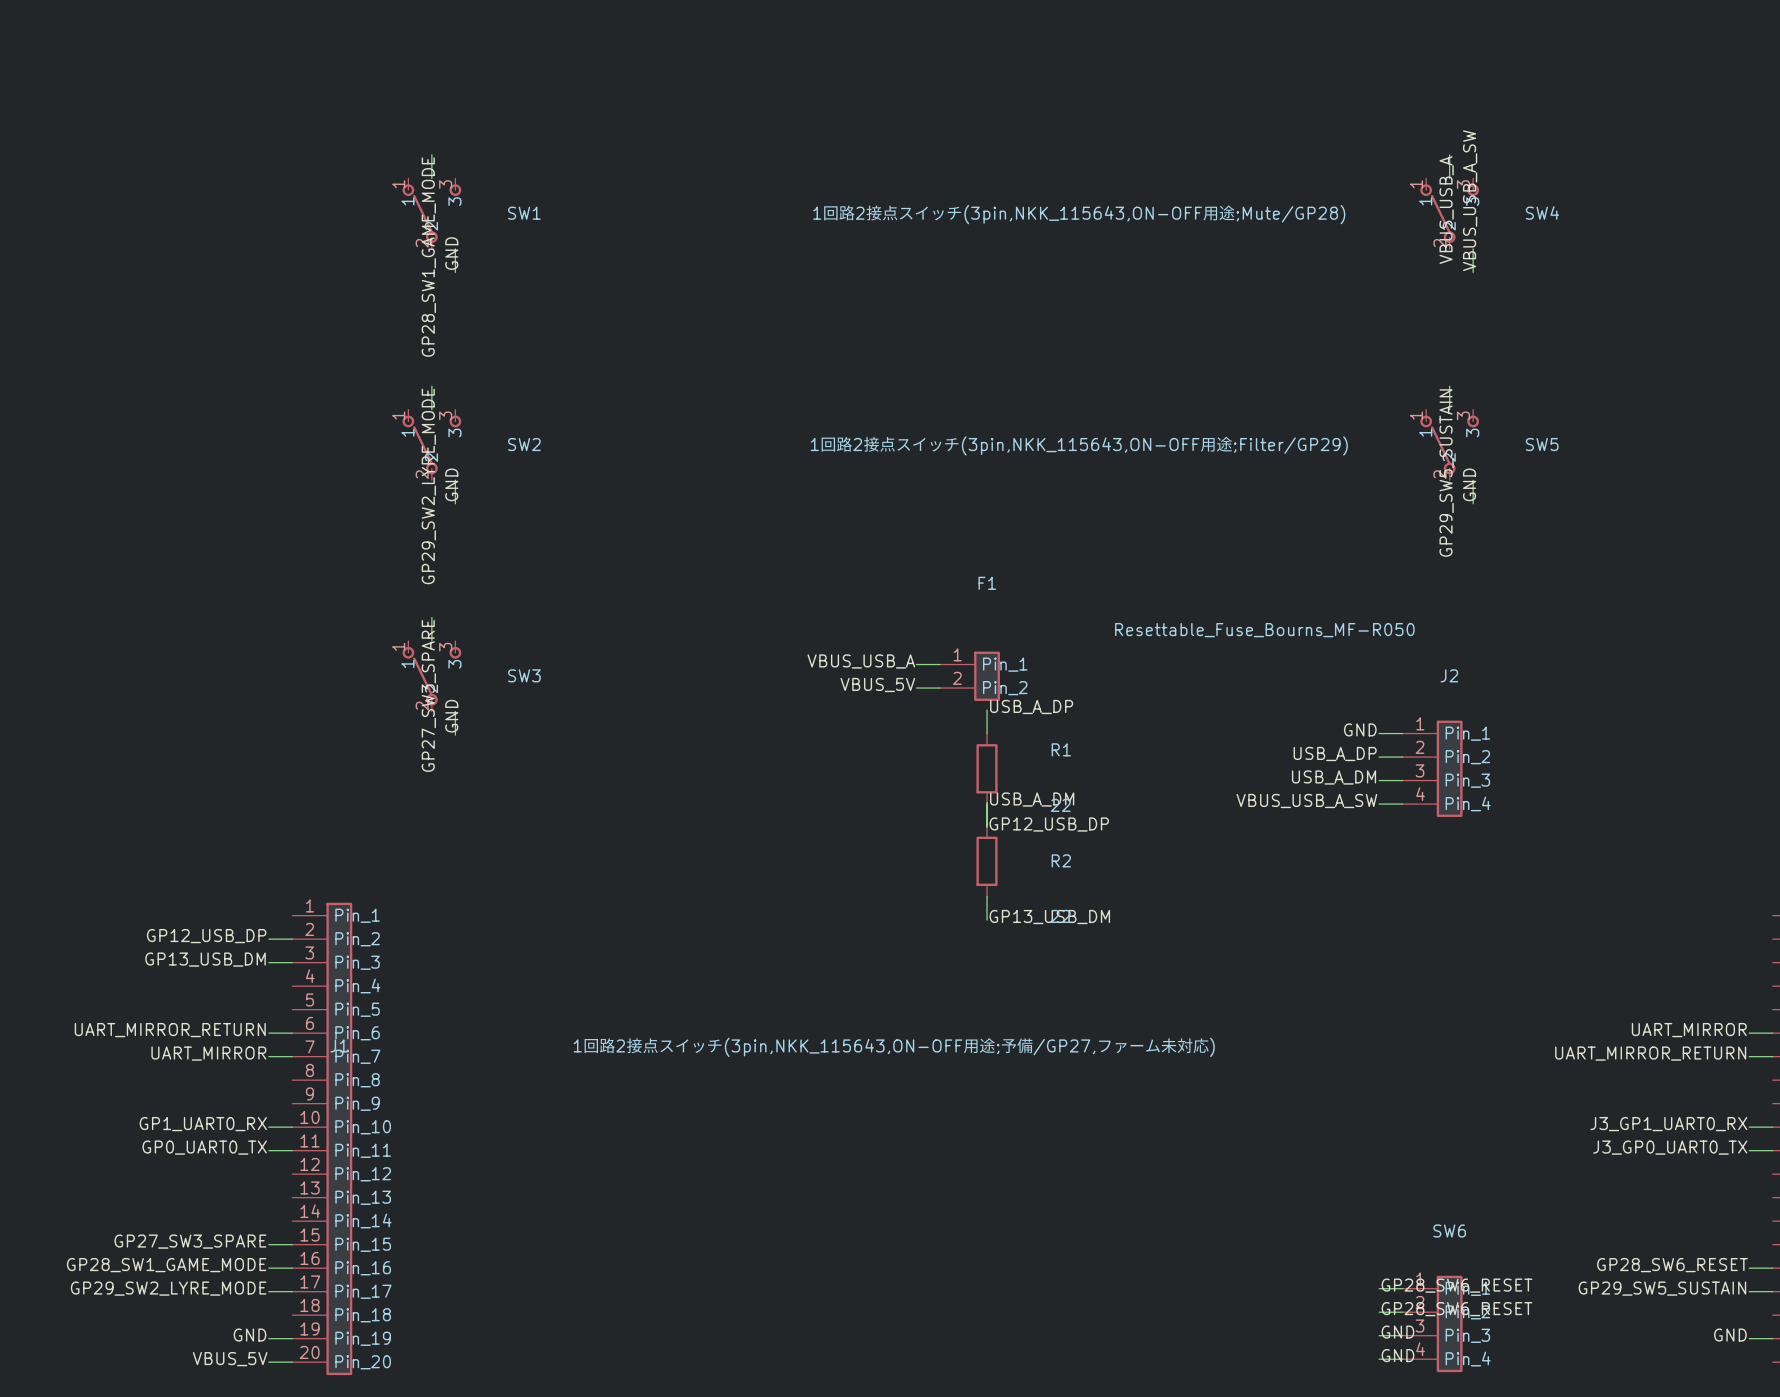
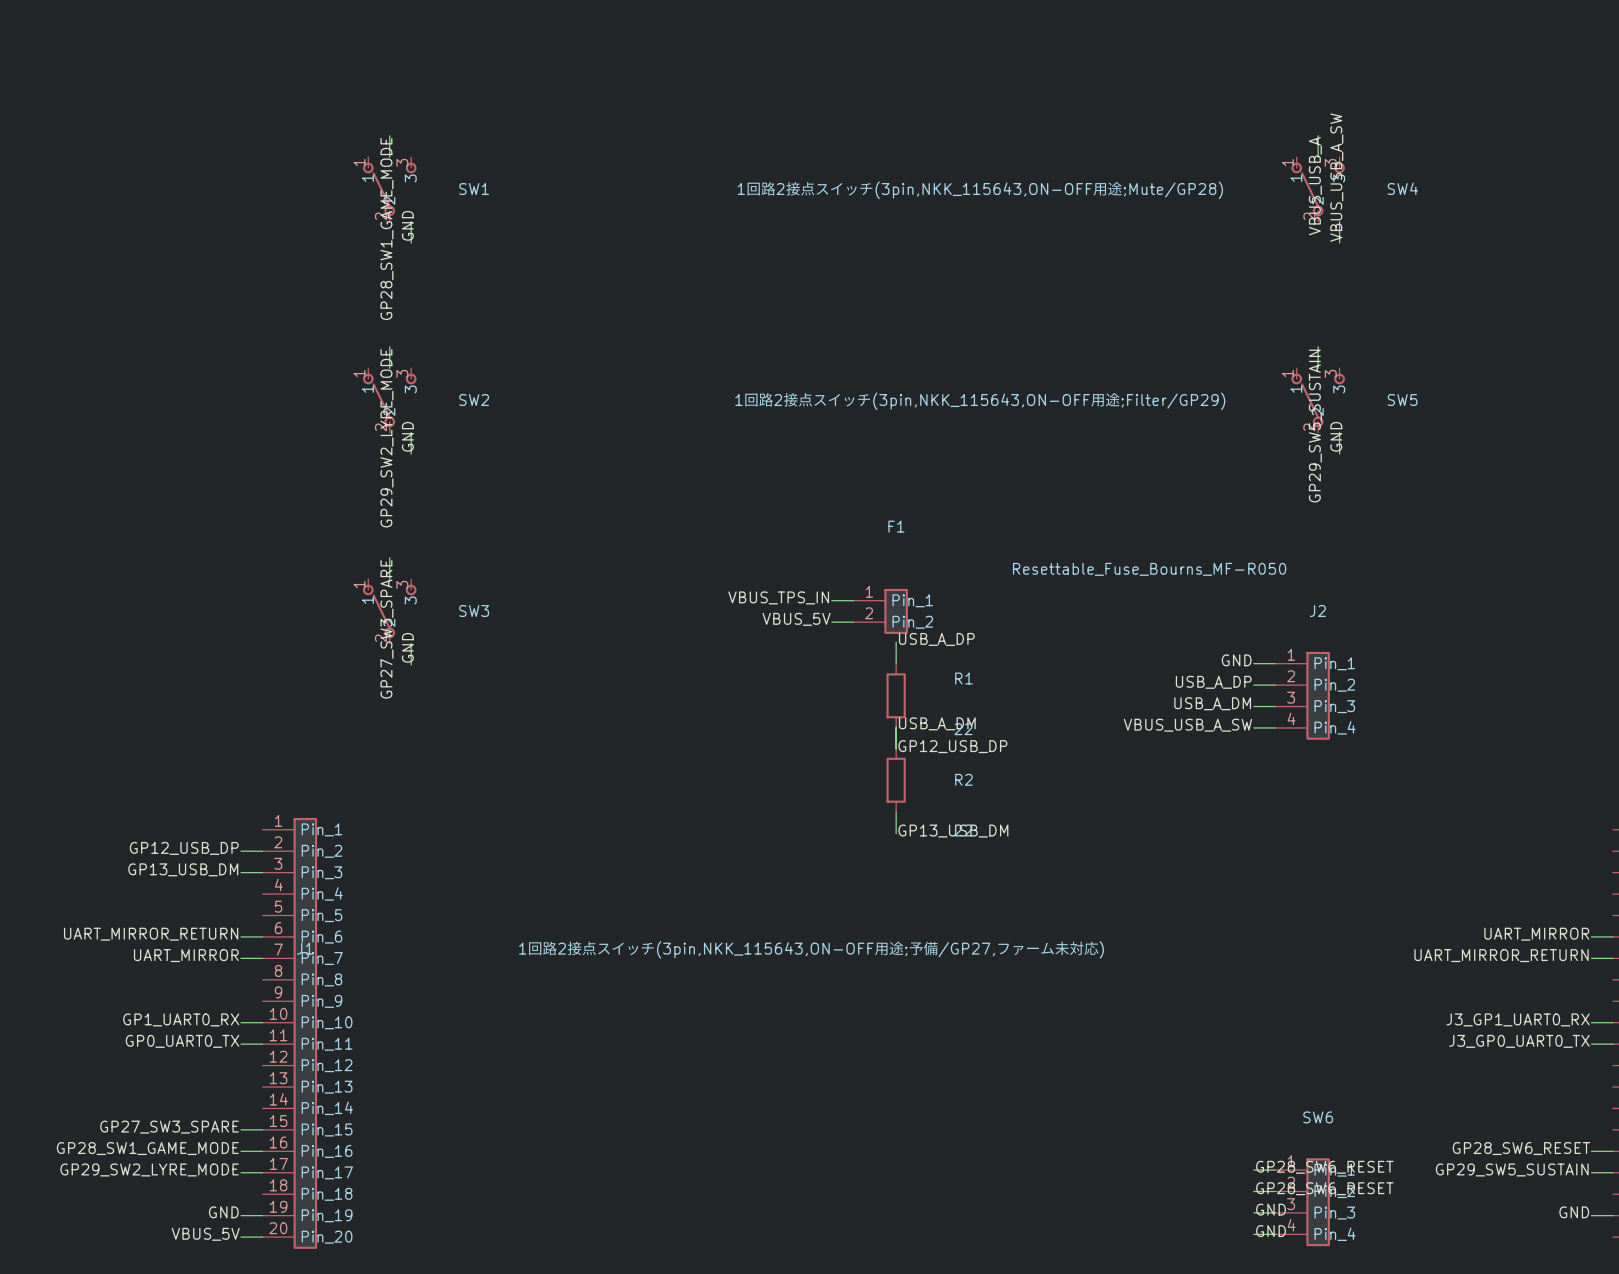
label: VBUS_USB_A (861, 661) -> VBUS_TPS_IN (778, 597)

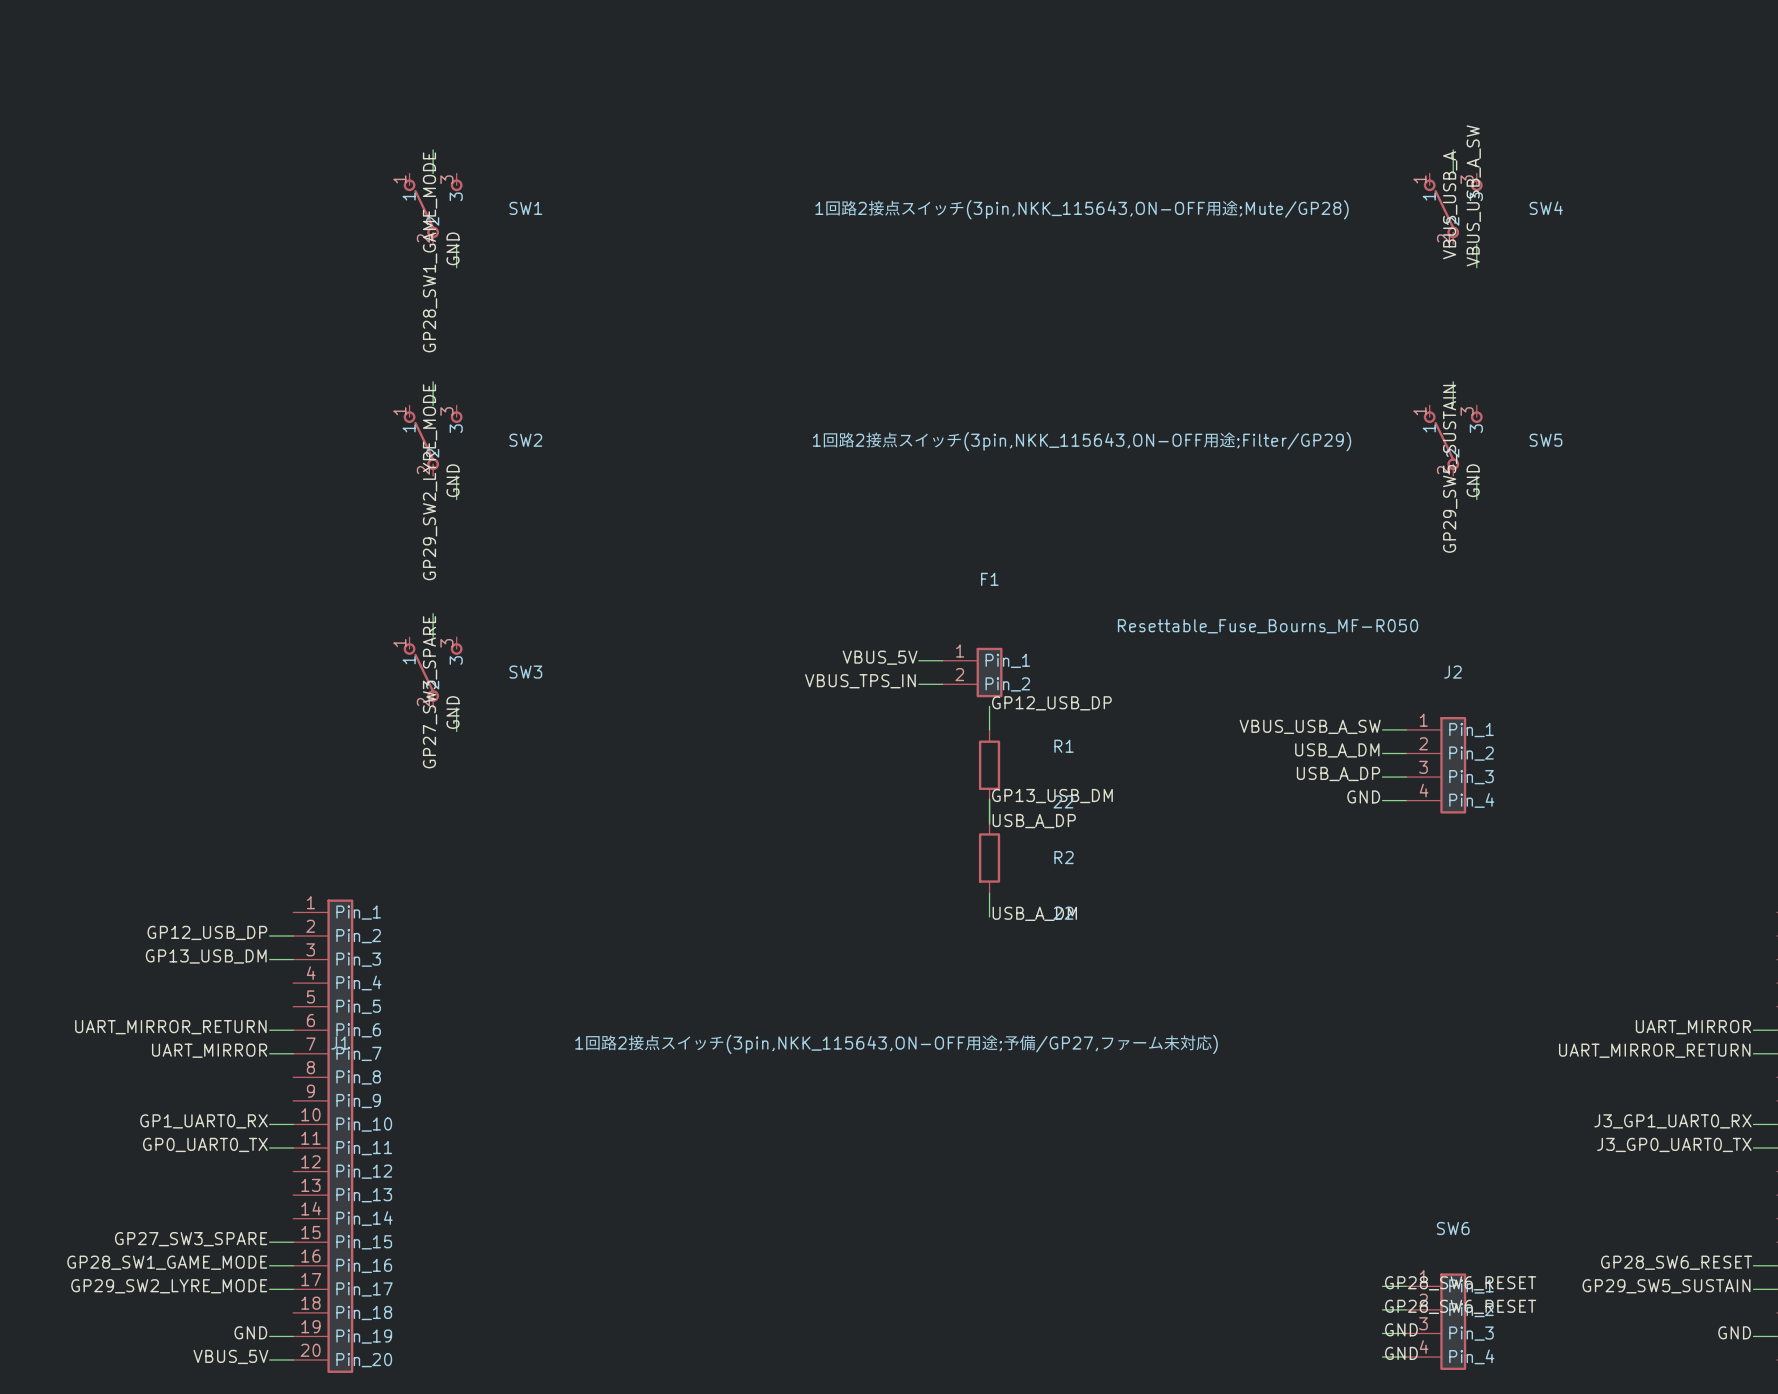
label: VBUS_TPS_IN (778, 597) -> VBUS_5V (880, 657)
label: VBUS_5V (796, 619) -> VBUS_TPS_IN (860, 681)
label: USB_A_DP (936, 639) -> GP12_USB_DP (1051, 703)
label: GND (1236, 660) -> VBUS_USB_A_SW (1310, 726)
label: USB_A_DP (1213, 682) -> USB_A_DM (1337, 750)
label: USB_A_DM (1212, 703) -> USB_A_DP (1338, 773)
label: USB_A_DM (937, 723) -> GP13_USB_DM (1052, 796)
label: VBUS_USB_A_SW (1187, 725) -> GND (1363, 796)
label: GP12_USB_DP (952, 746) -> USB_A_DP (1034, 821)
label: GP13_USB_DM (953, 831) -> USB_A_DM (1034, 913)

